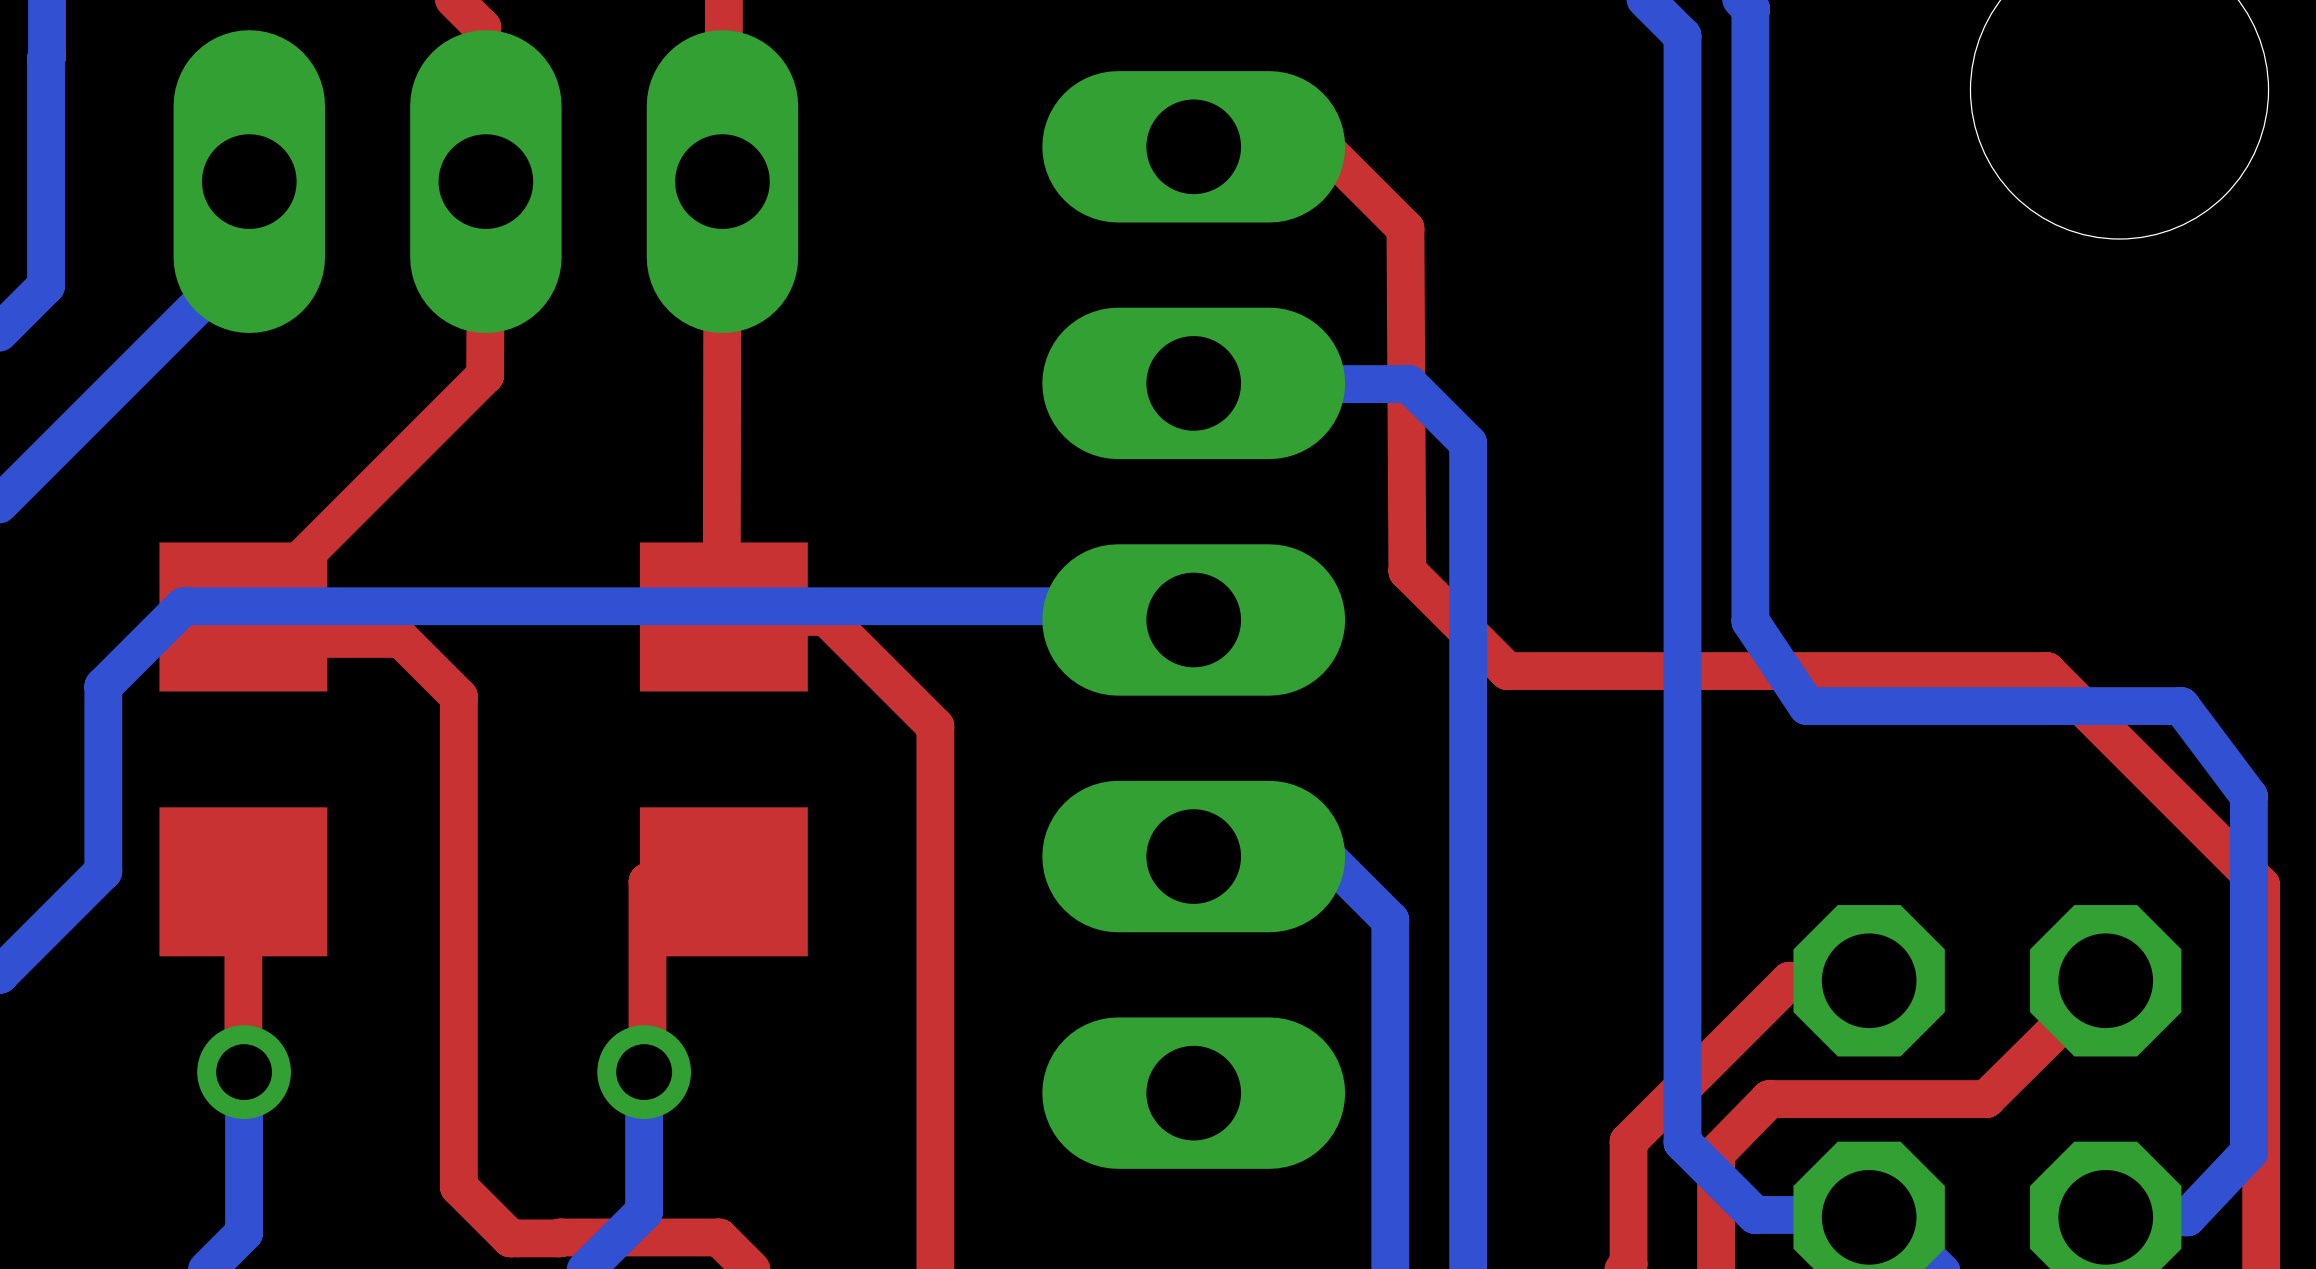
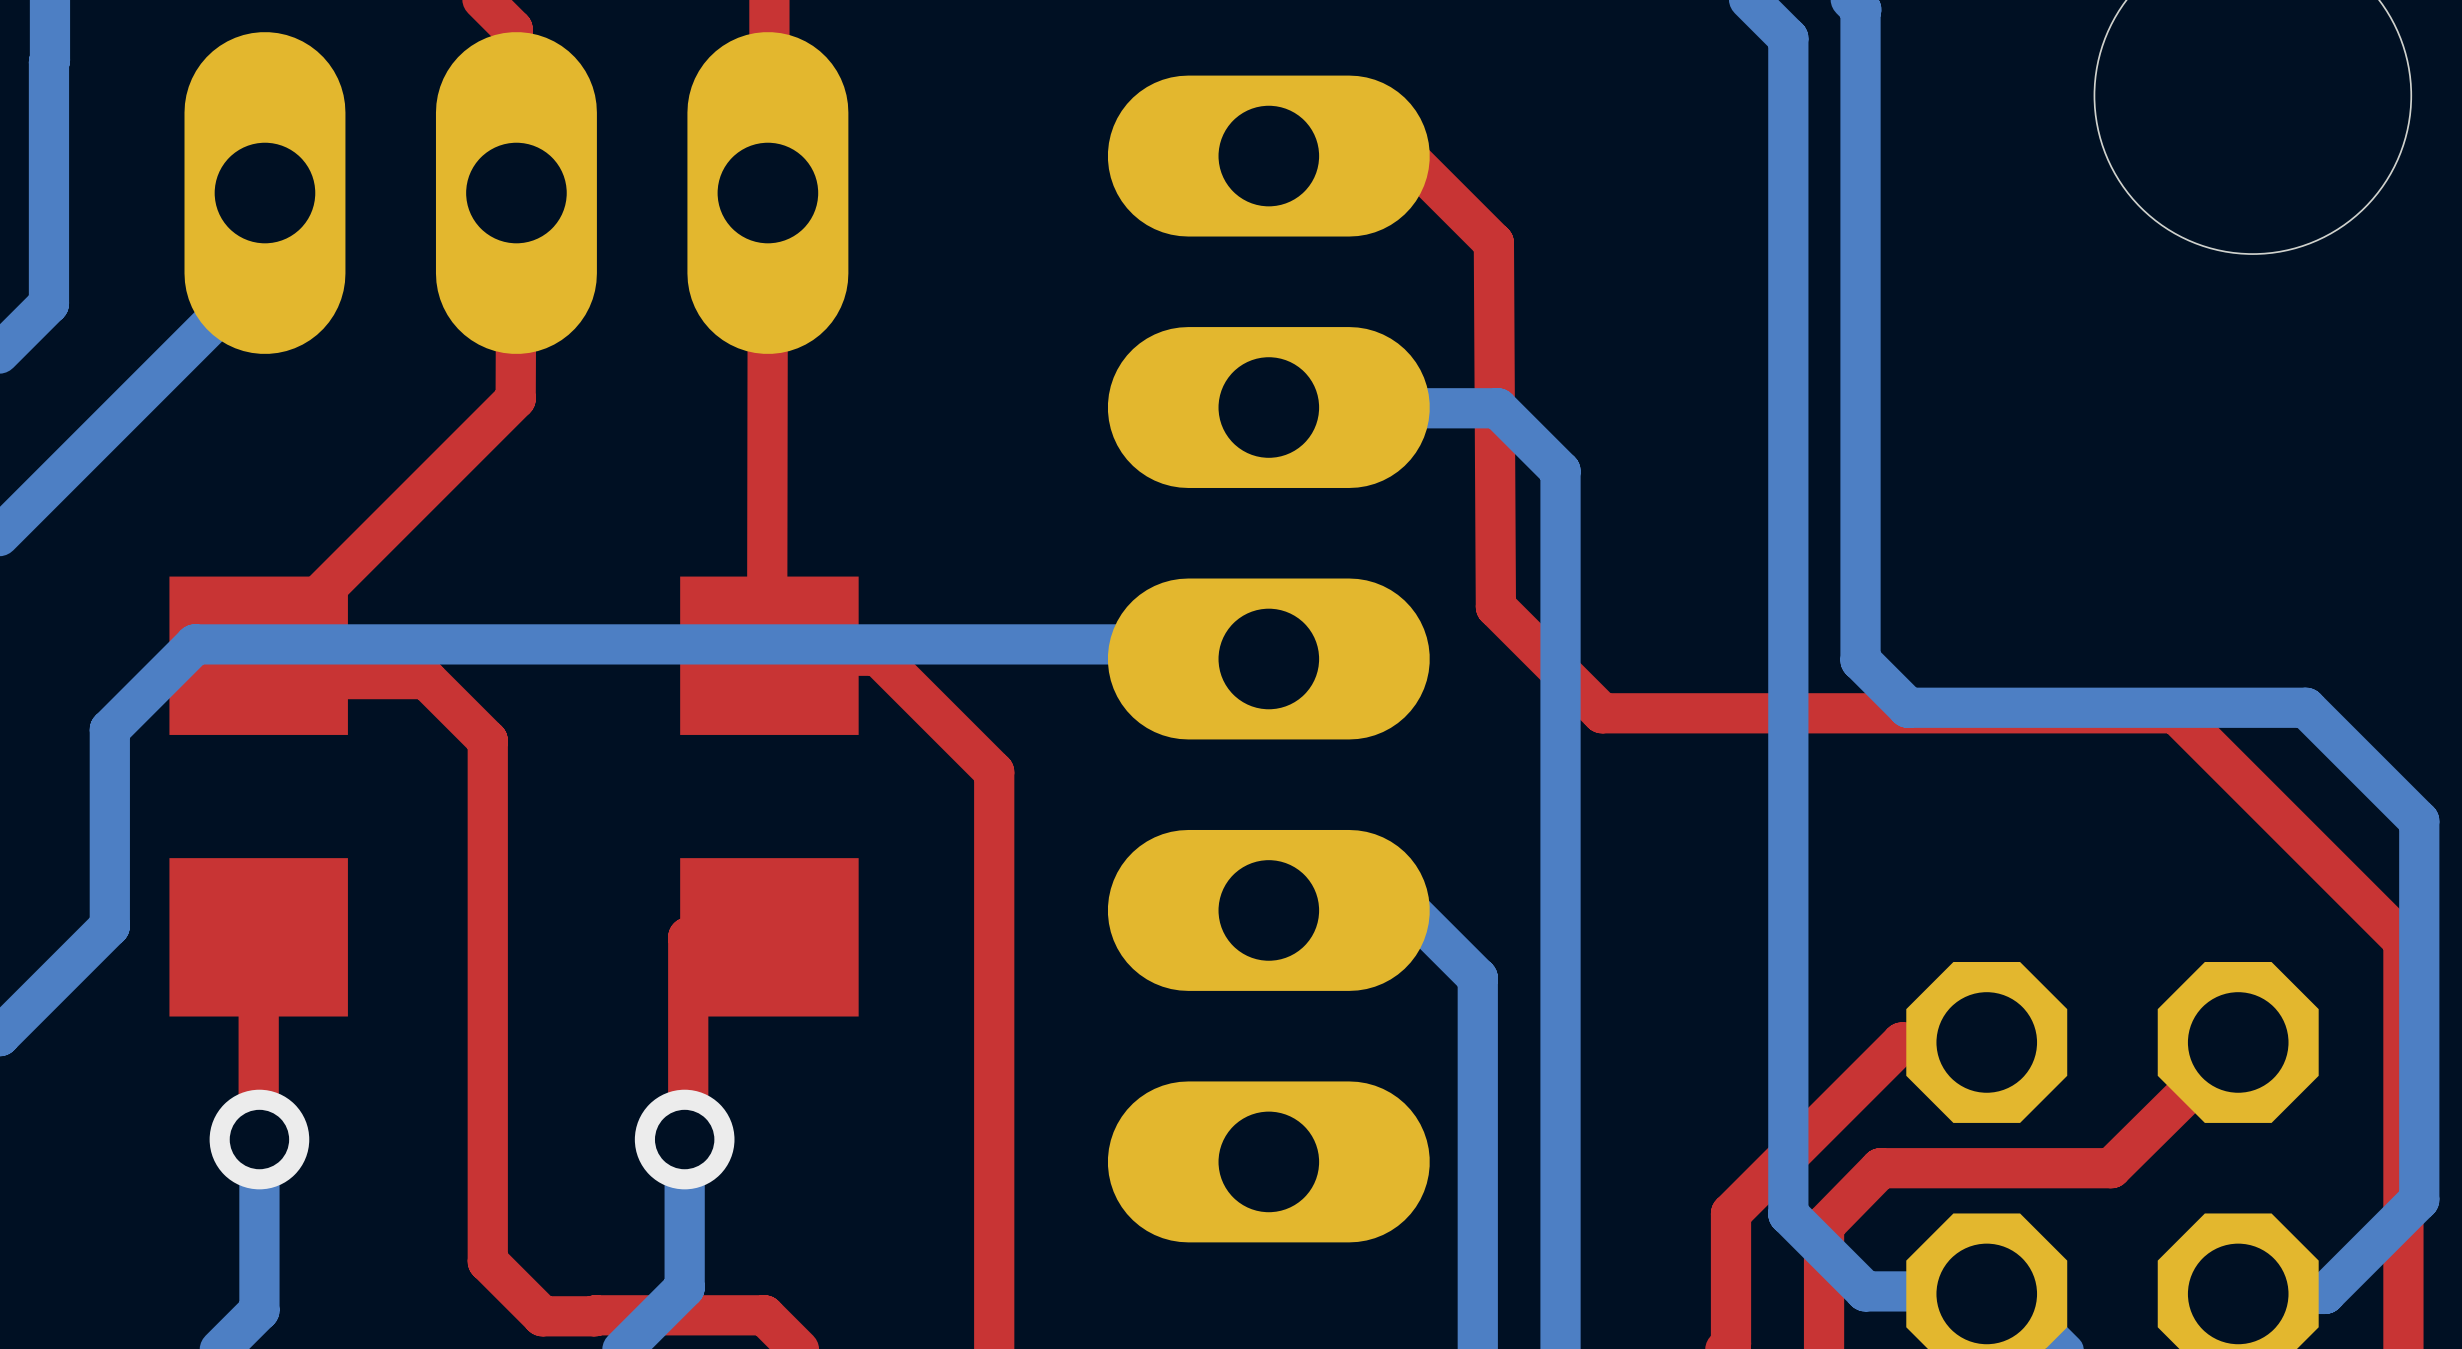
bottom track: (1750, 621) (1806, 706) (2181, 706) (2248, 796) (2248, 1152) (2187, 1217) -> (1860, 660) (1908, 707) (2305, 707) (2419, 821) (2419, 1199) (2324, 1293)

